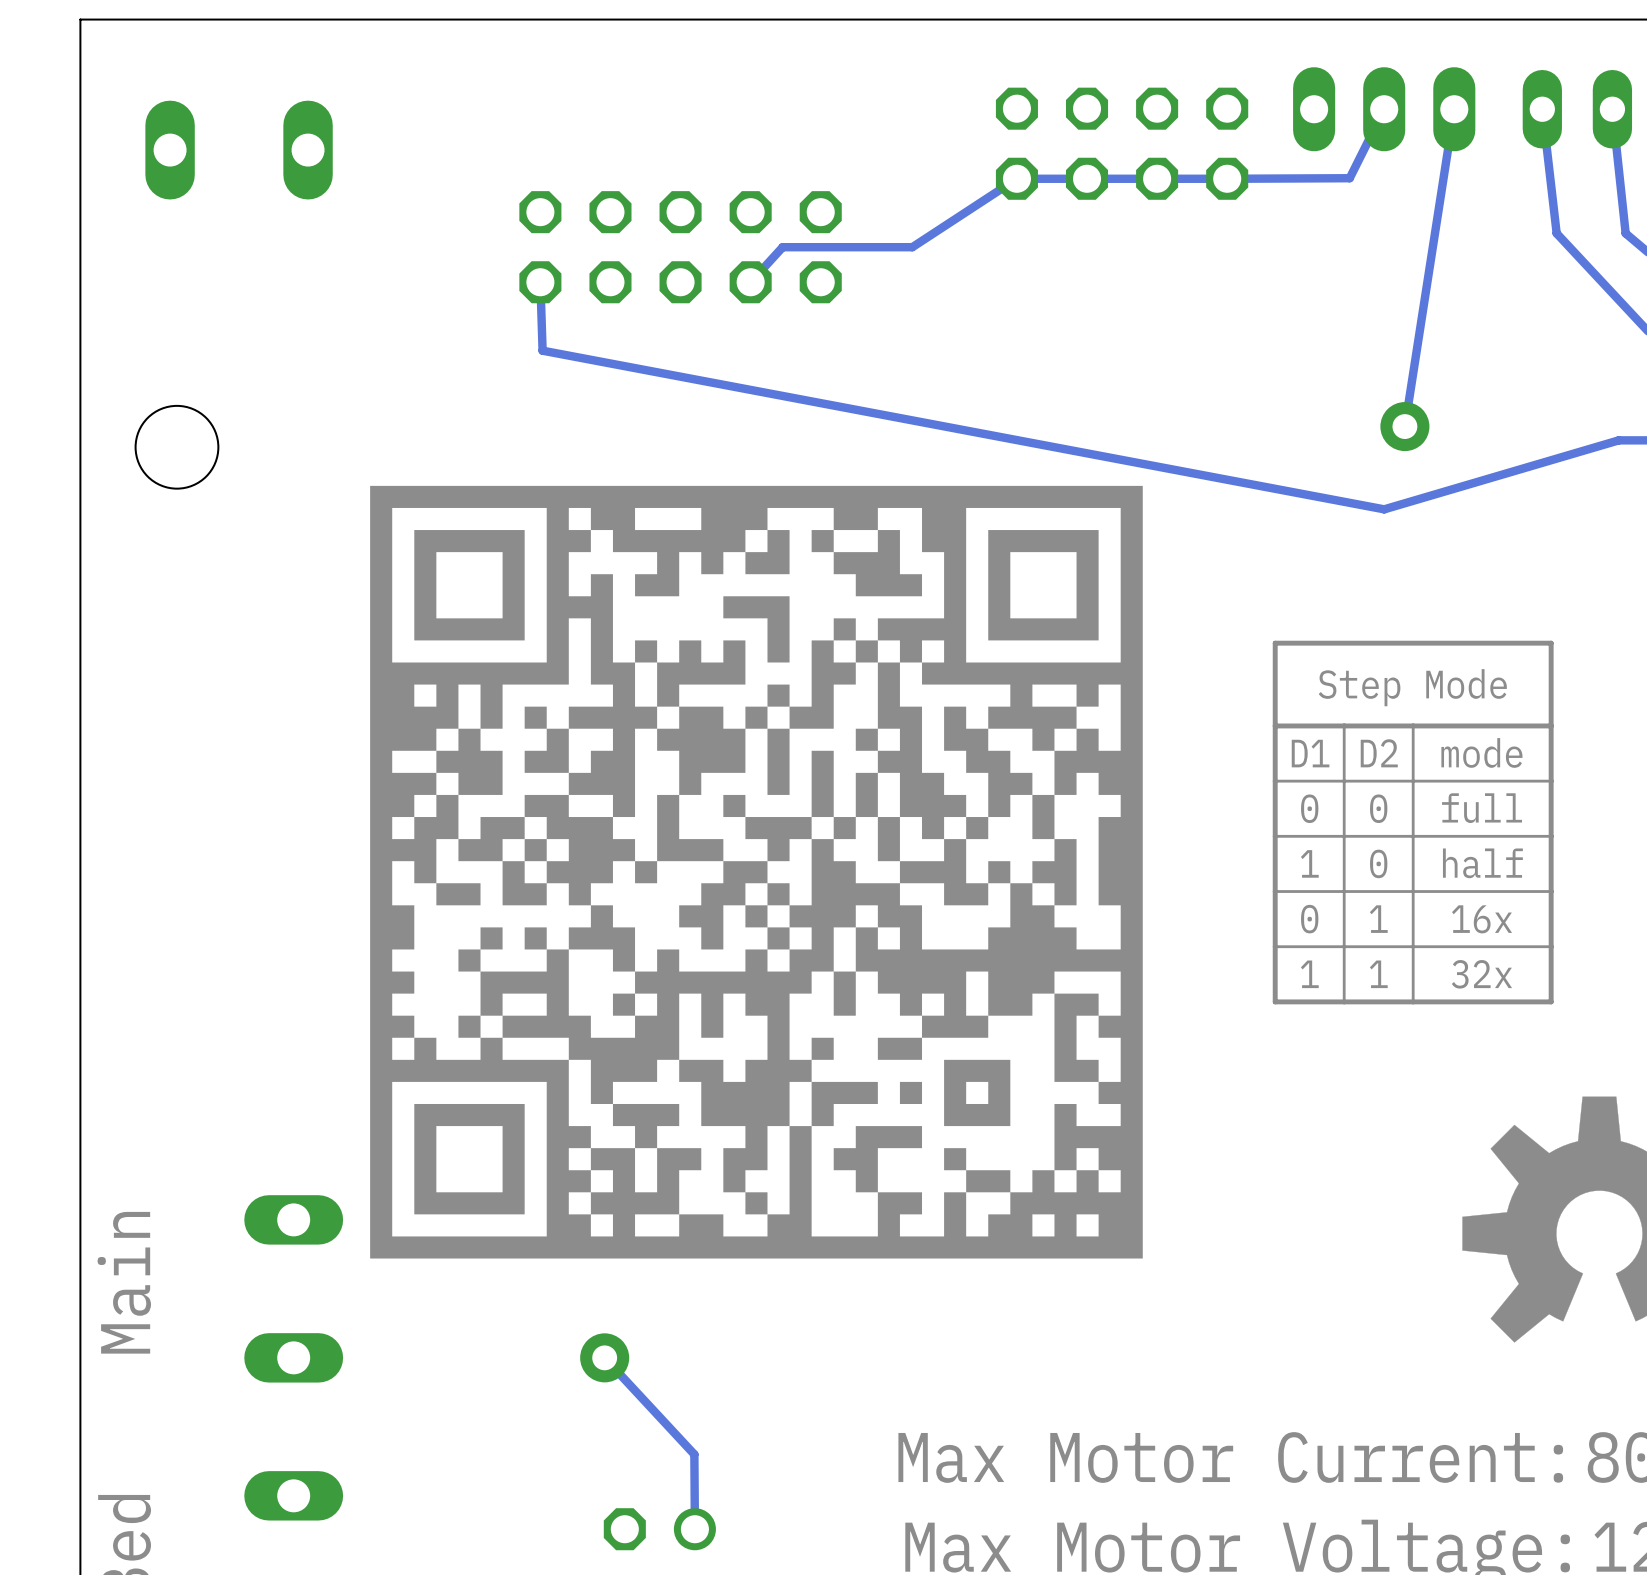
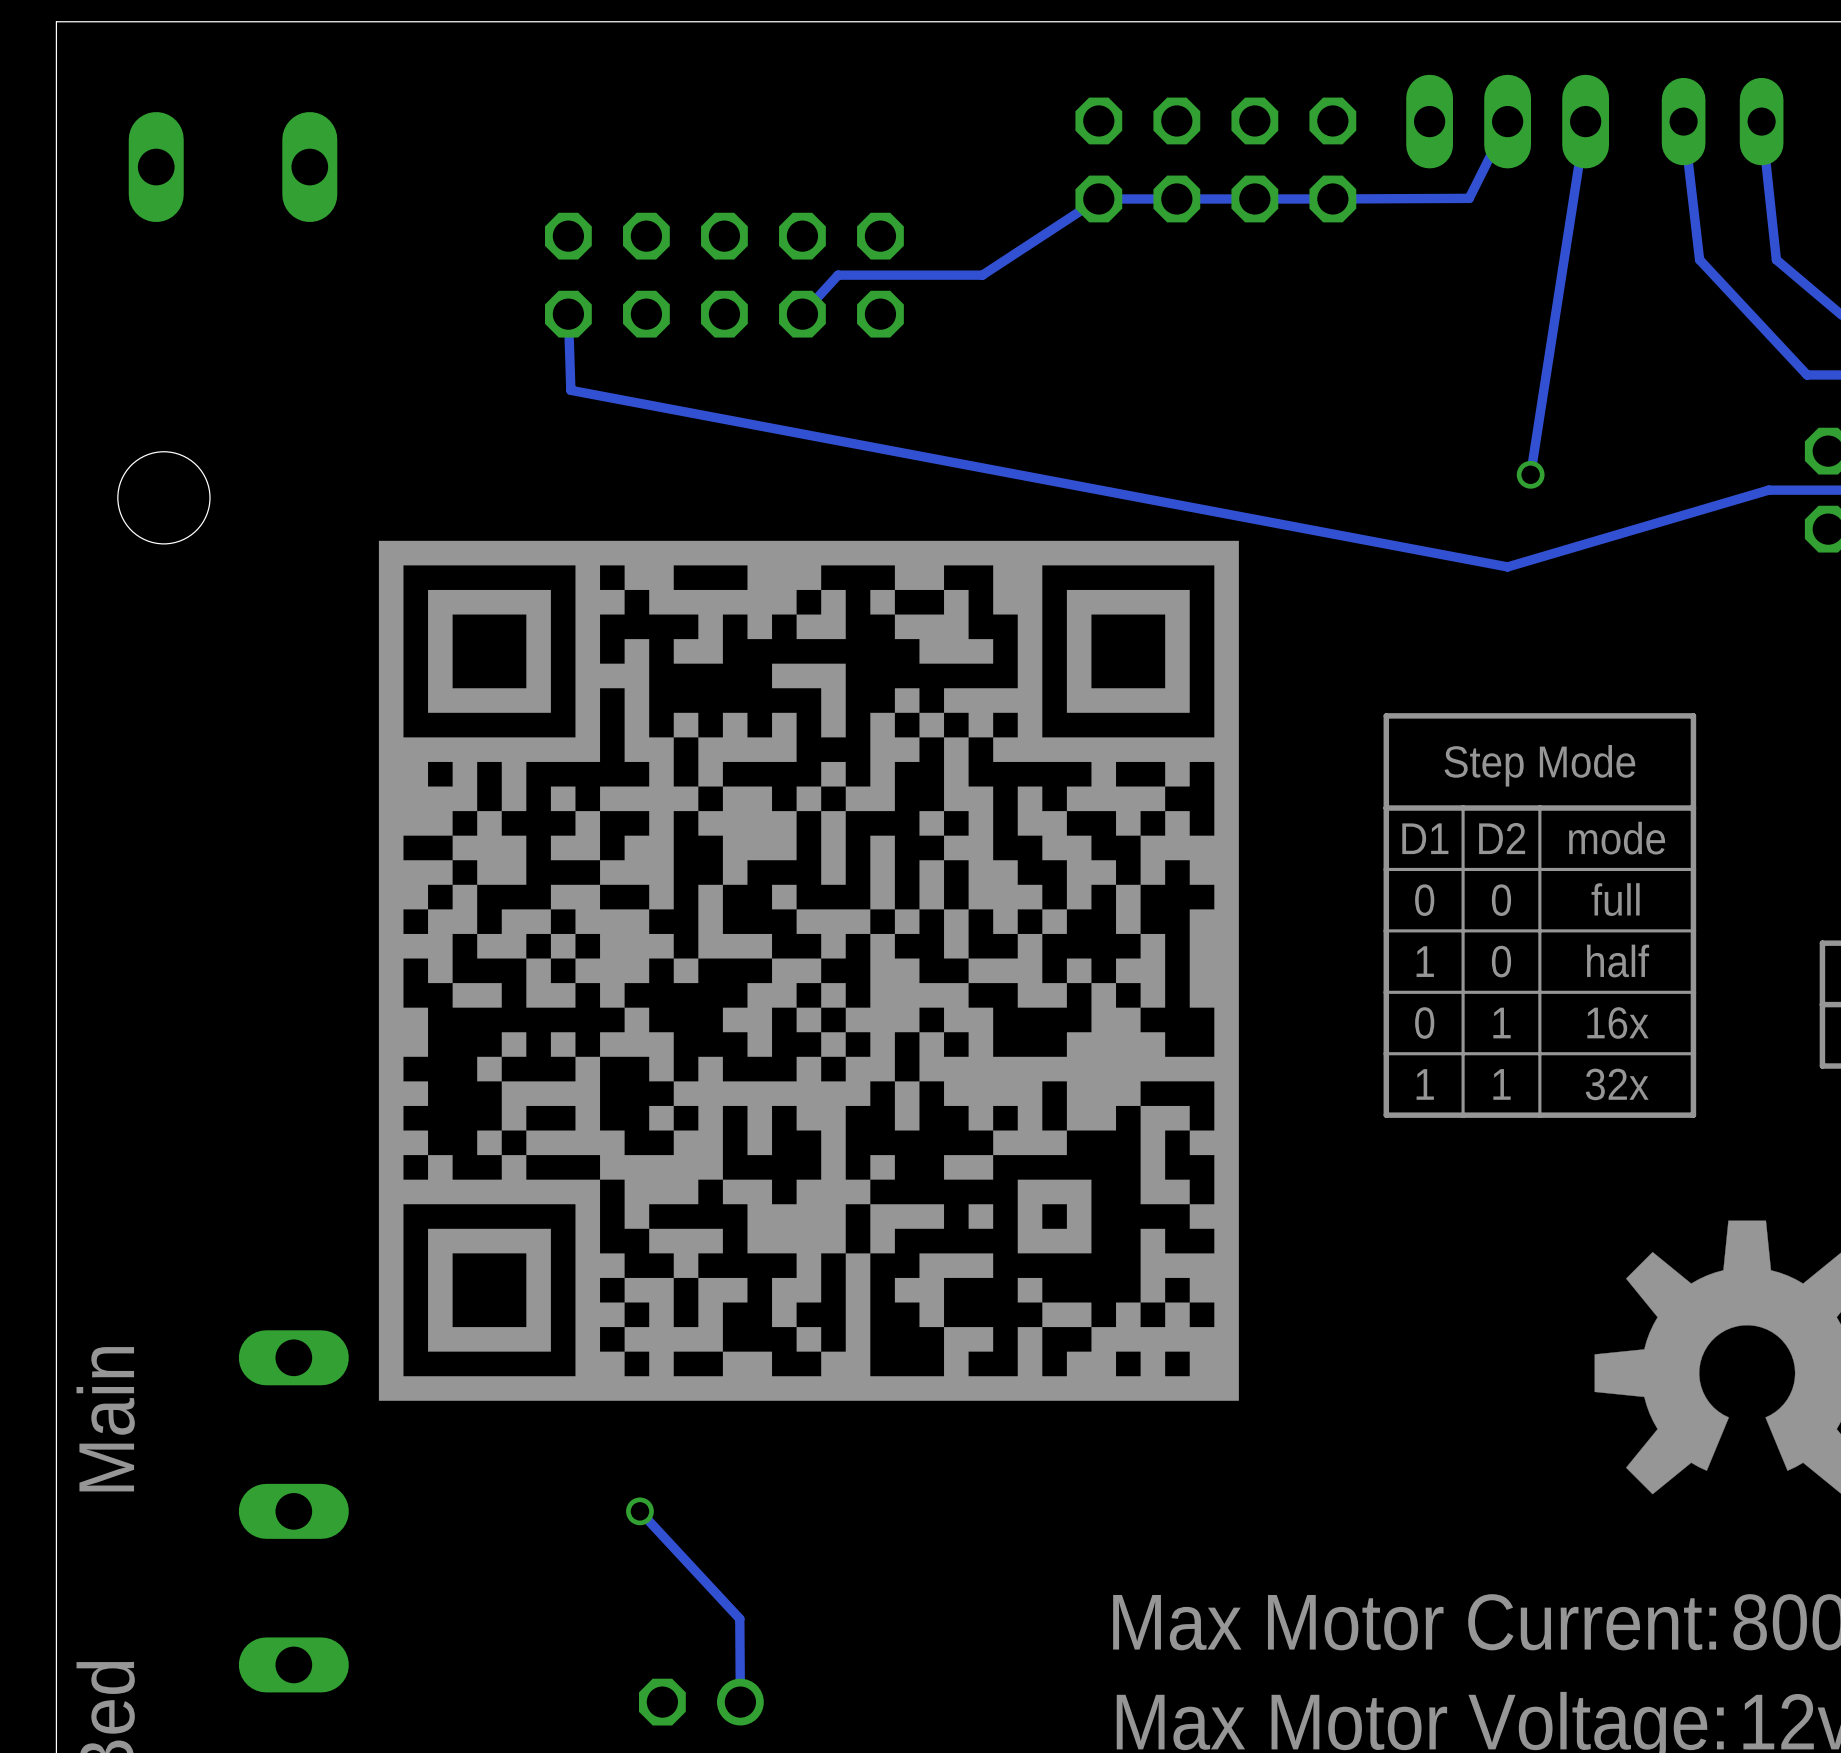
via size: [1380, 402, 1430, 452] -> [1516, 460, 1545, 489]
via size: [580, 1333, 630, 1383] -> [626, 1497, 654, 1526]

